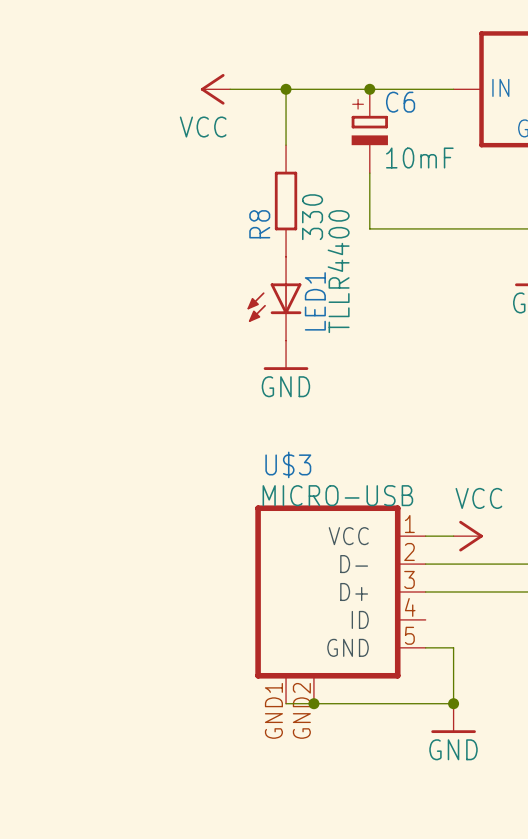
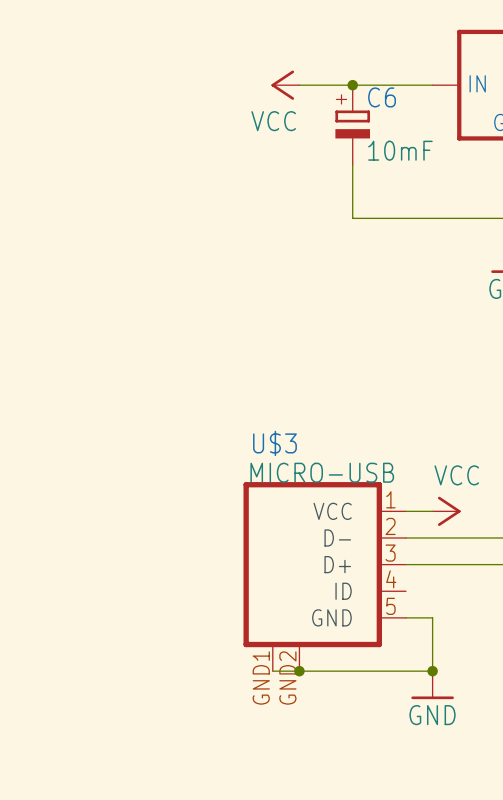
power symbol position: VCC (215, 89) -> VCC (285, 85)
wire: (230, 89) (313, 89) -> none
wire: (286, 89) (286, 145) -> none
junction: (286, 89) -> none
R8: 330 (286, 201) -> none
LED1: TLLR4400 (274, 298) -> none
power symbol: GND (286, 355) -> none

